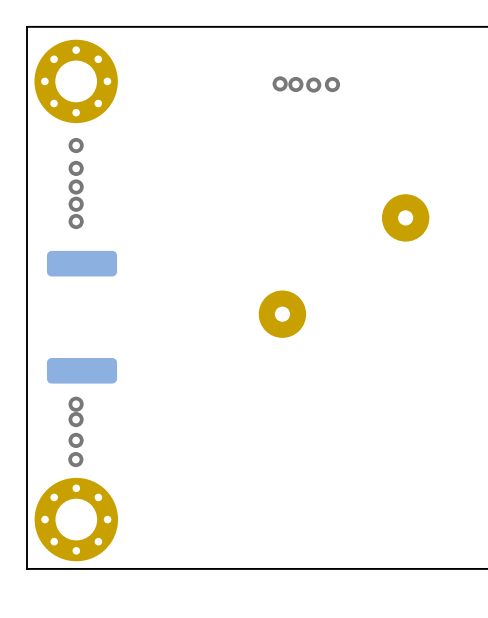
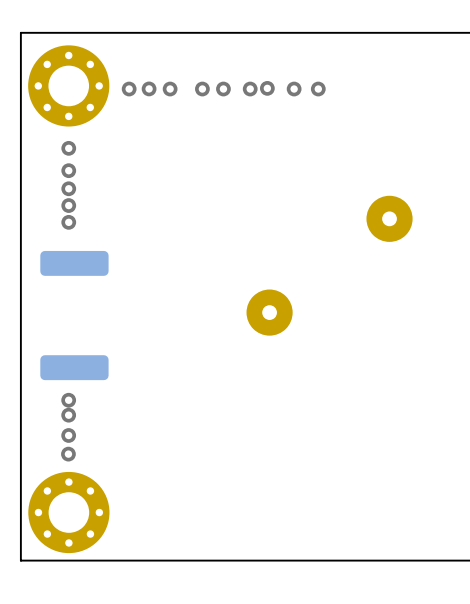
via: none -> (129, 89)
via: none -> (149, 88)
via: none -> (170, 89)
via: none -> (202, 89)
via: none -> (223, 89)
via: none -> (250, 89)
via: (295, 84) -> none
via: none -> (294, 89)
via: (313, 85) -> none

